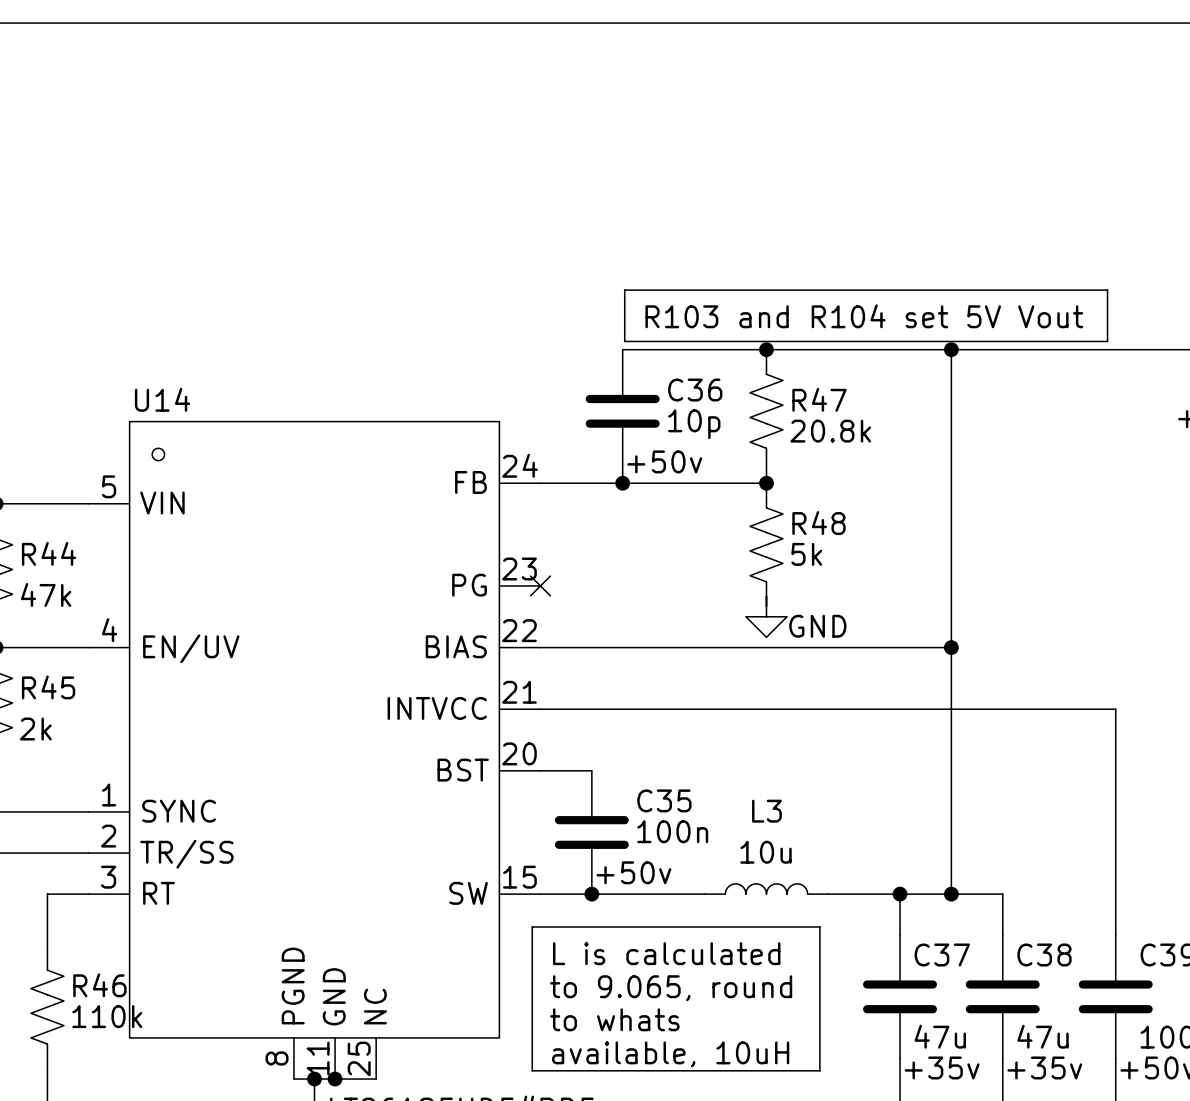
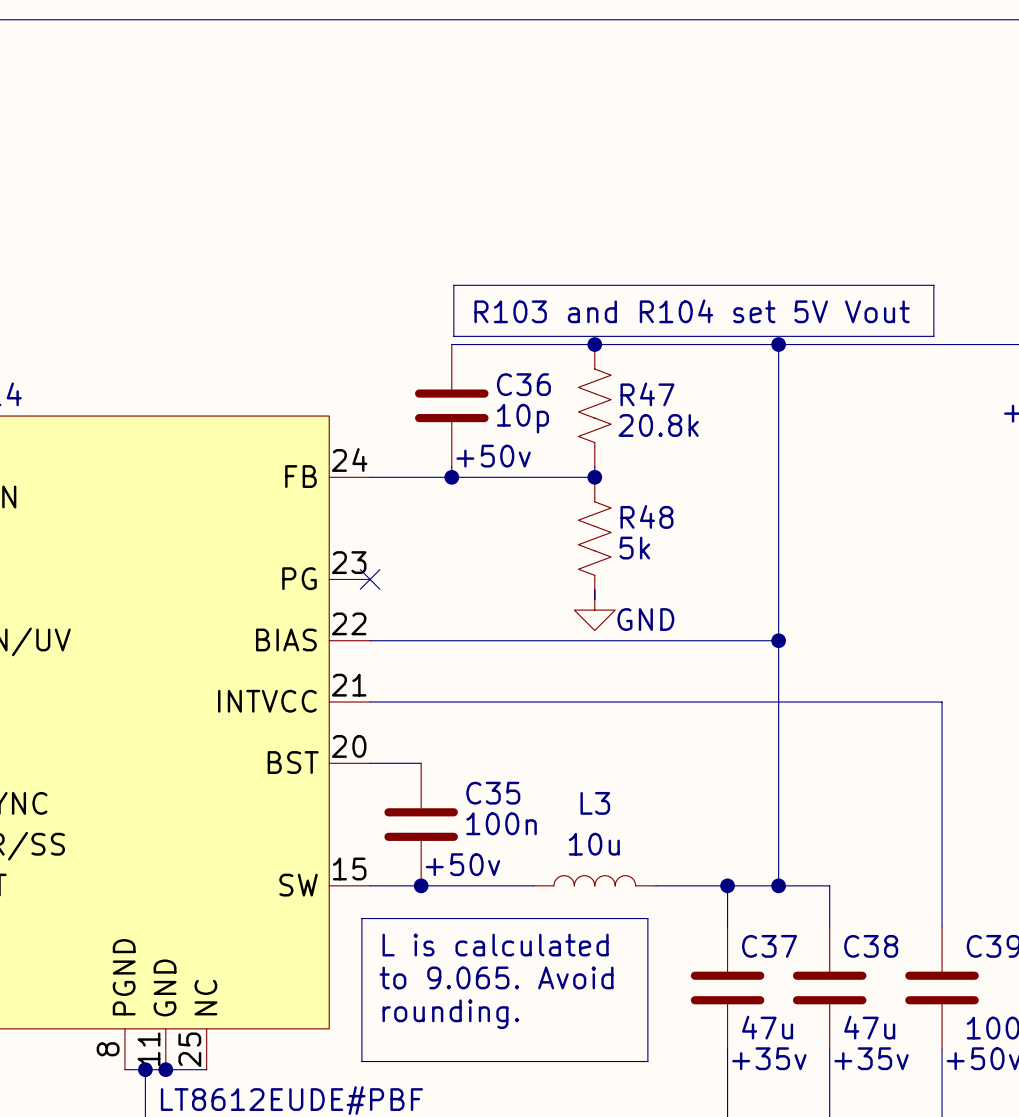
text: to 9.065, round (671, 988) -> to 9.065. Avoid (496, 977)
text: to whats (614, 1019) -> rounding. (450, 1014)
text: available, 10uH (670, 1054) -> none

